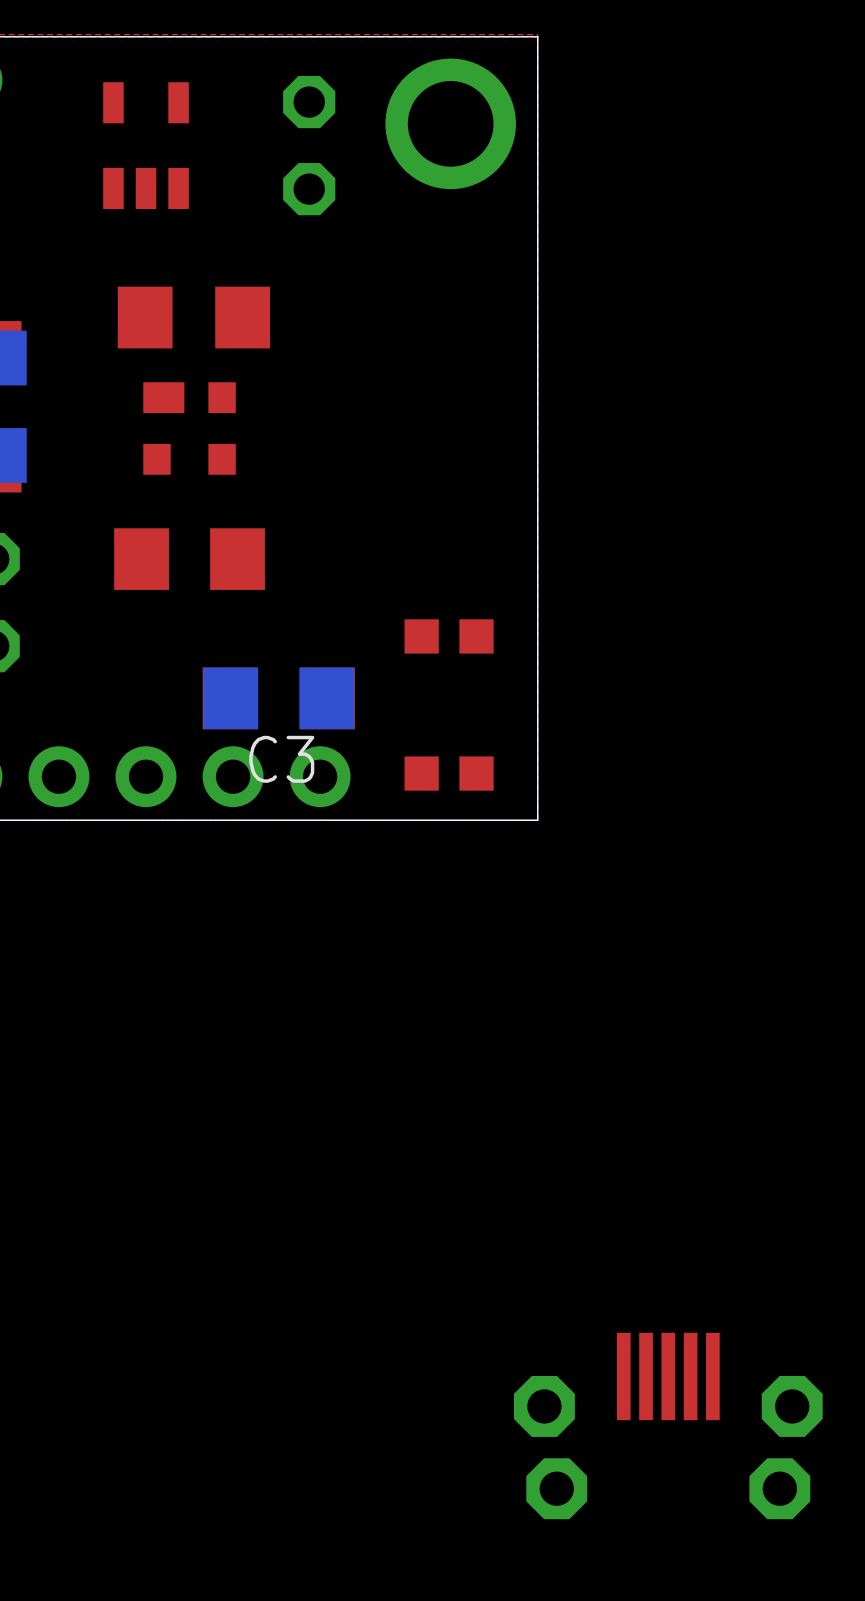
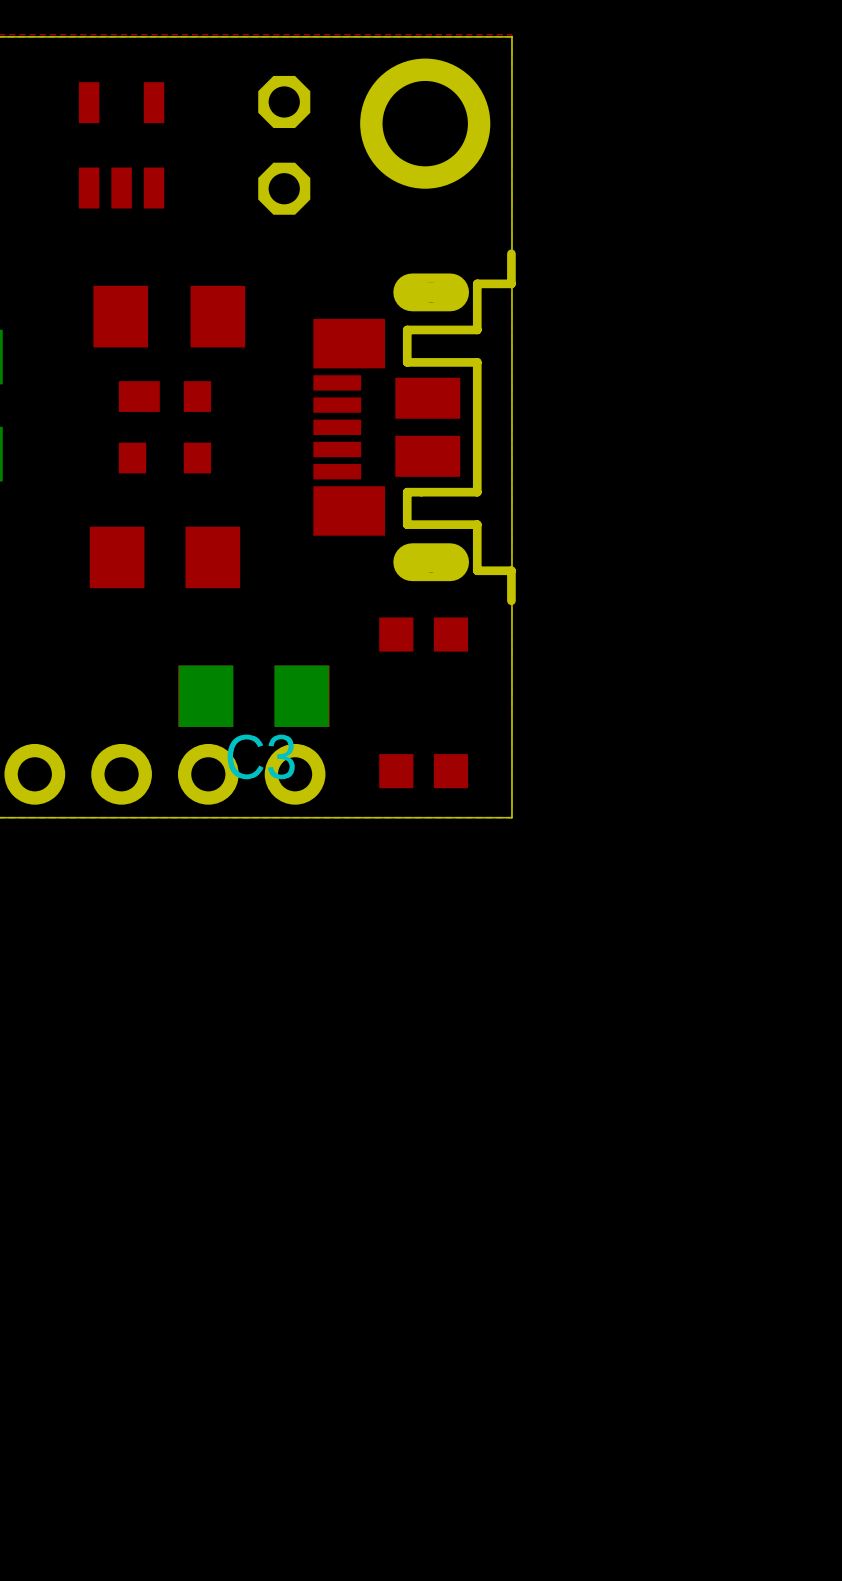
part: none -> (414, 427)
part: (668, 1425) -> none

